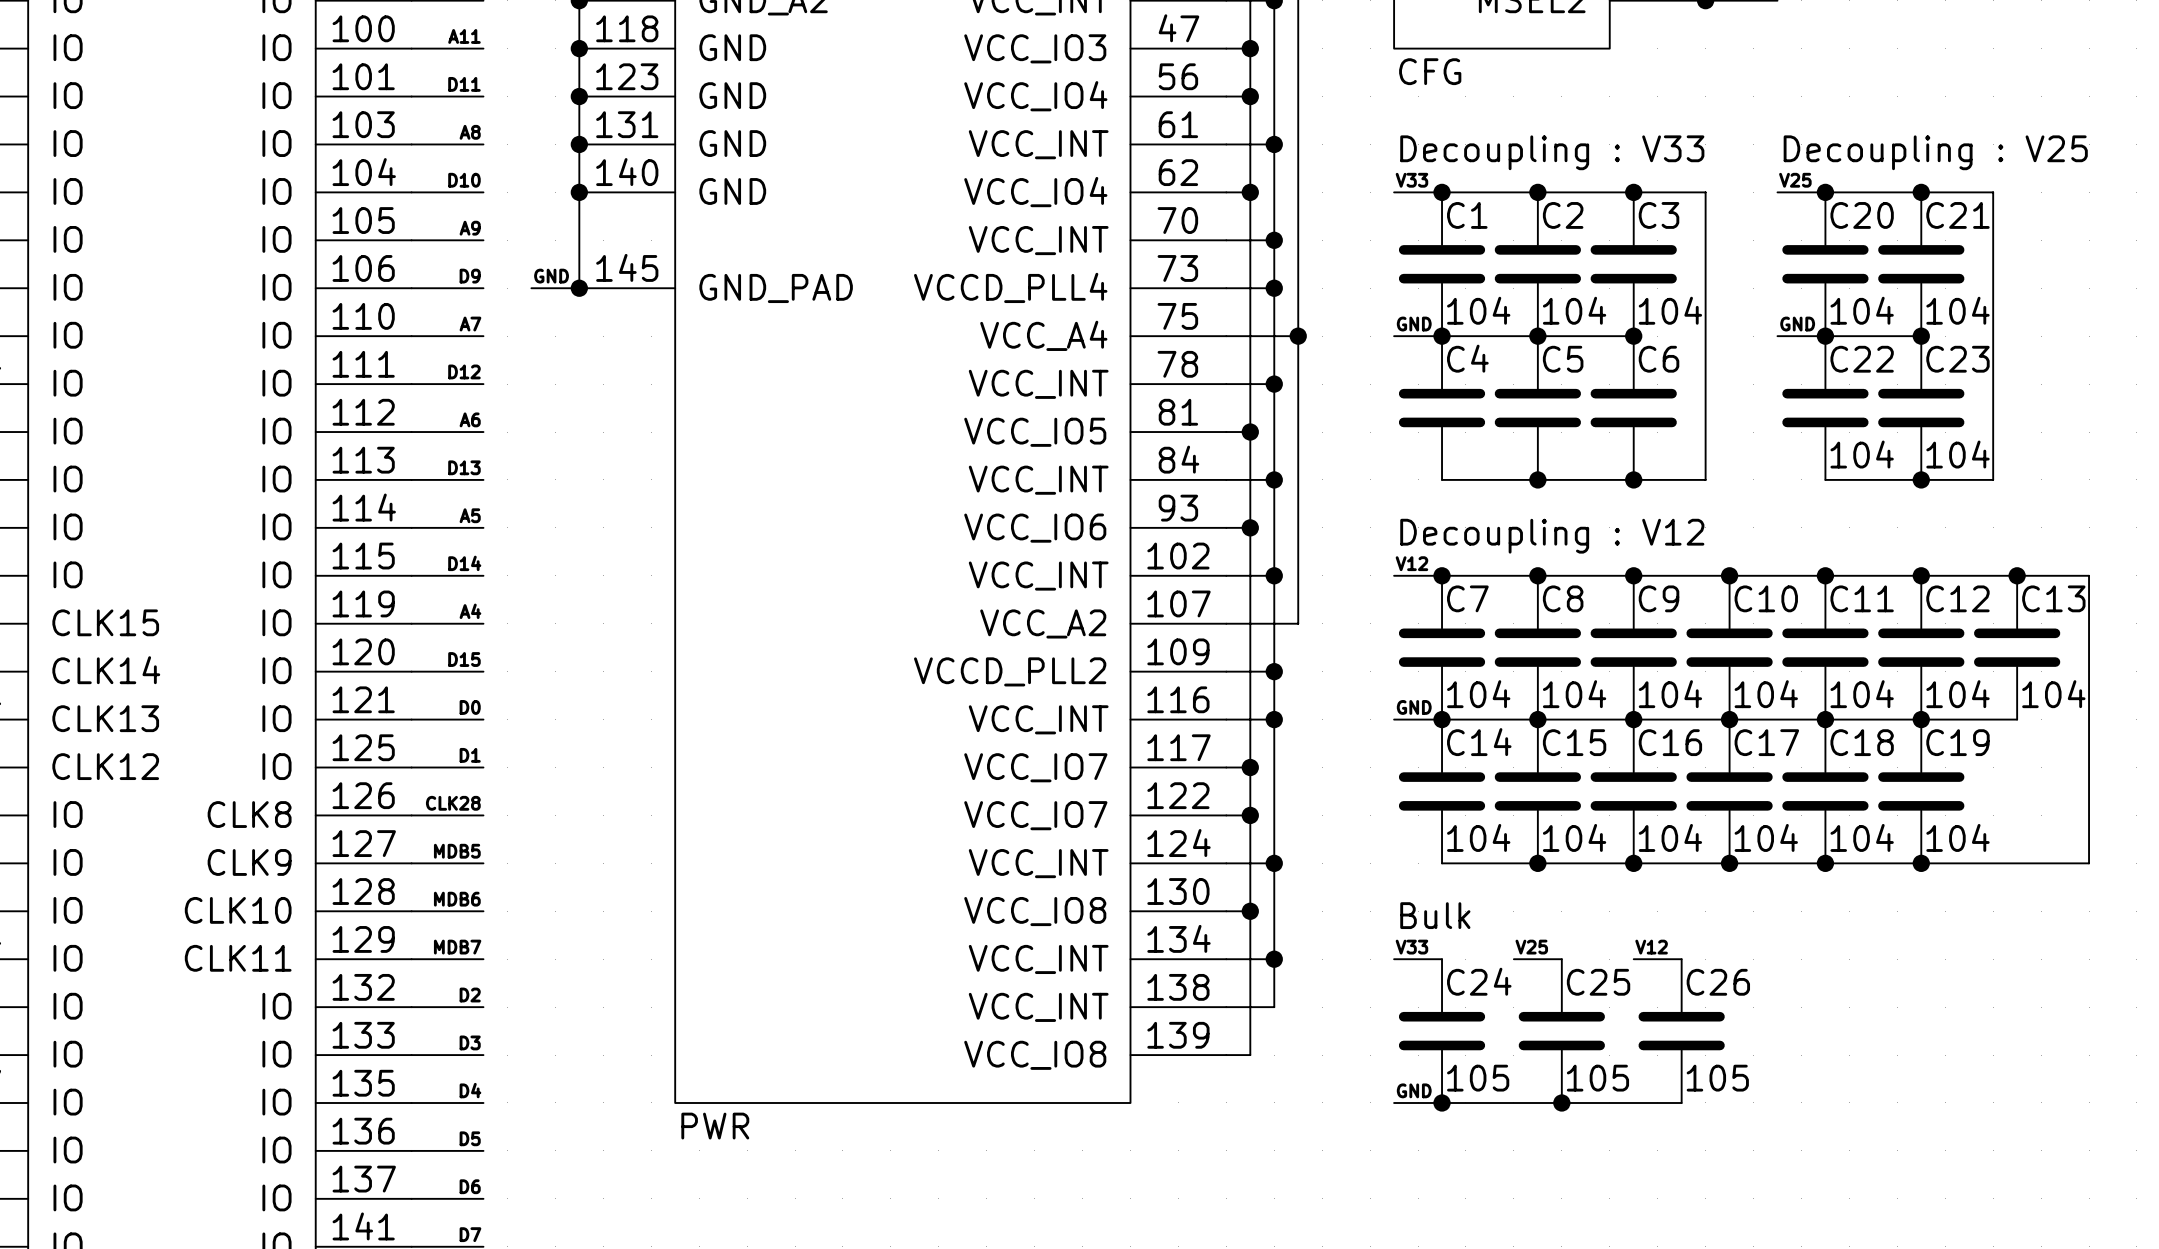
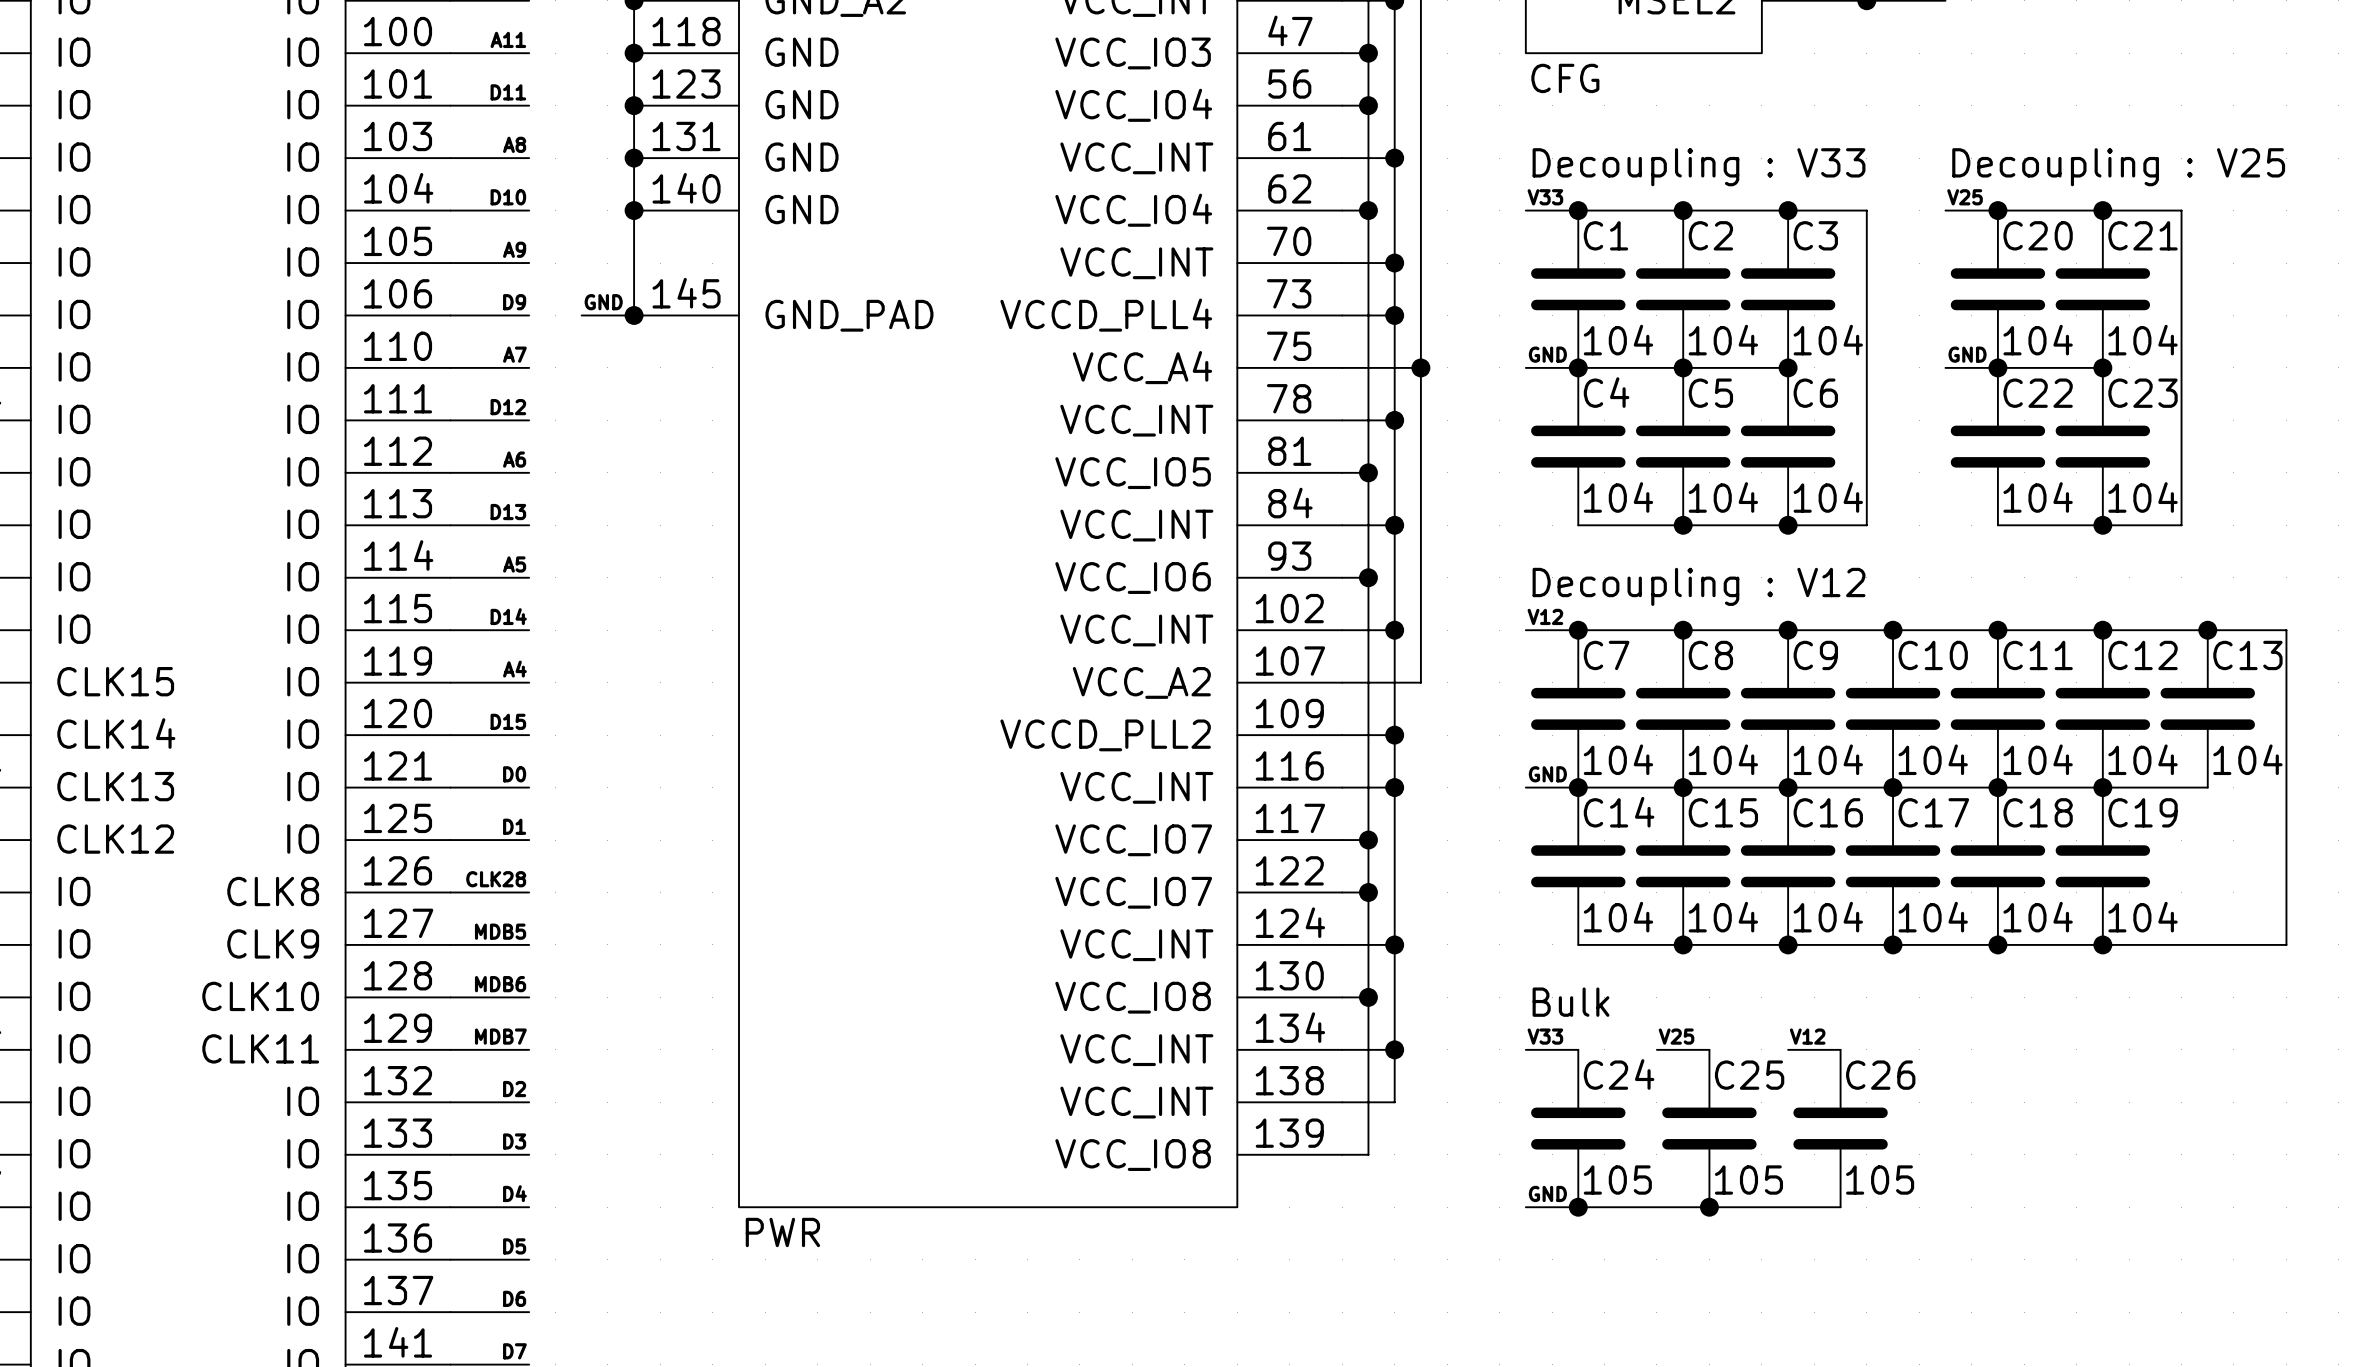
C4 value: none -> 104 (1618, 497)
C5 value: none -> 104 (1723, 497)
C6 value: none -> 104 (1828, 497)

